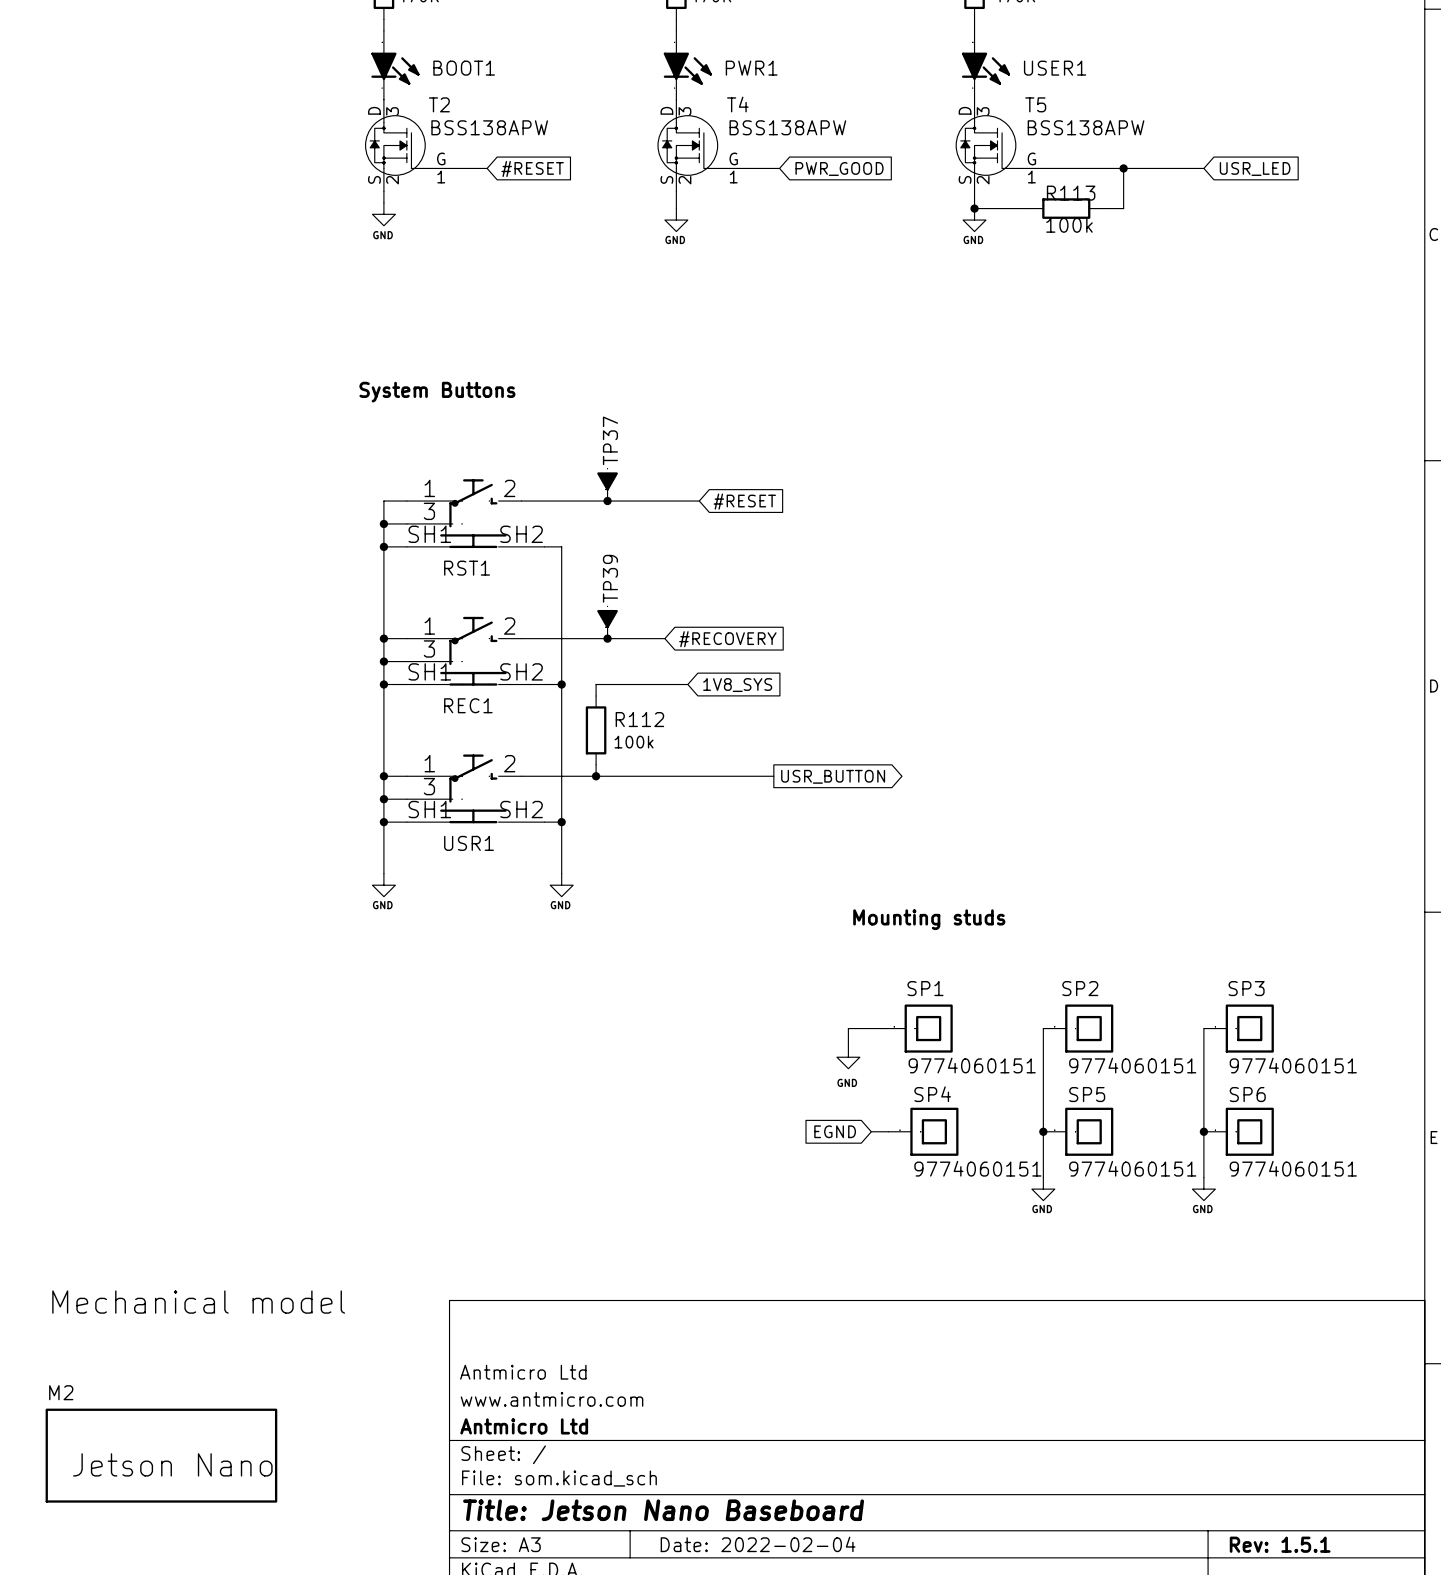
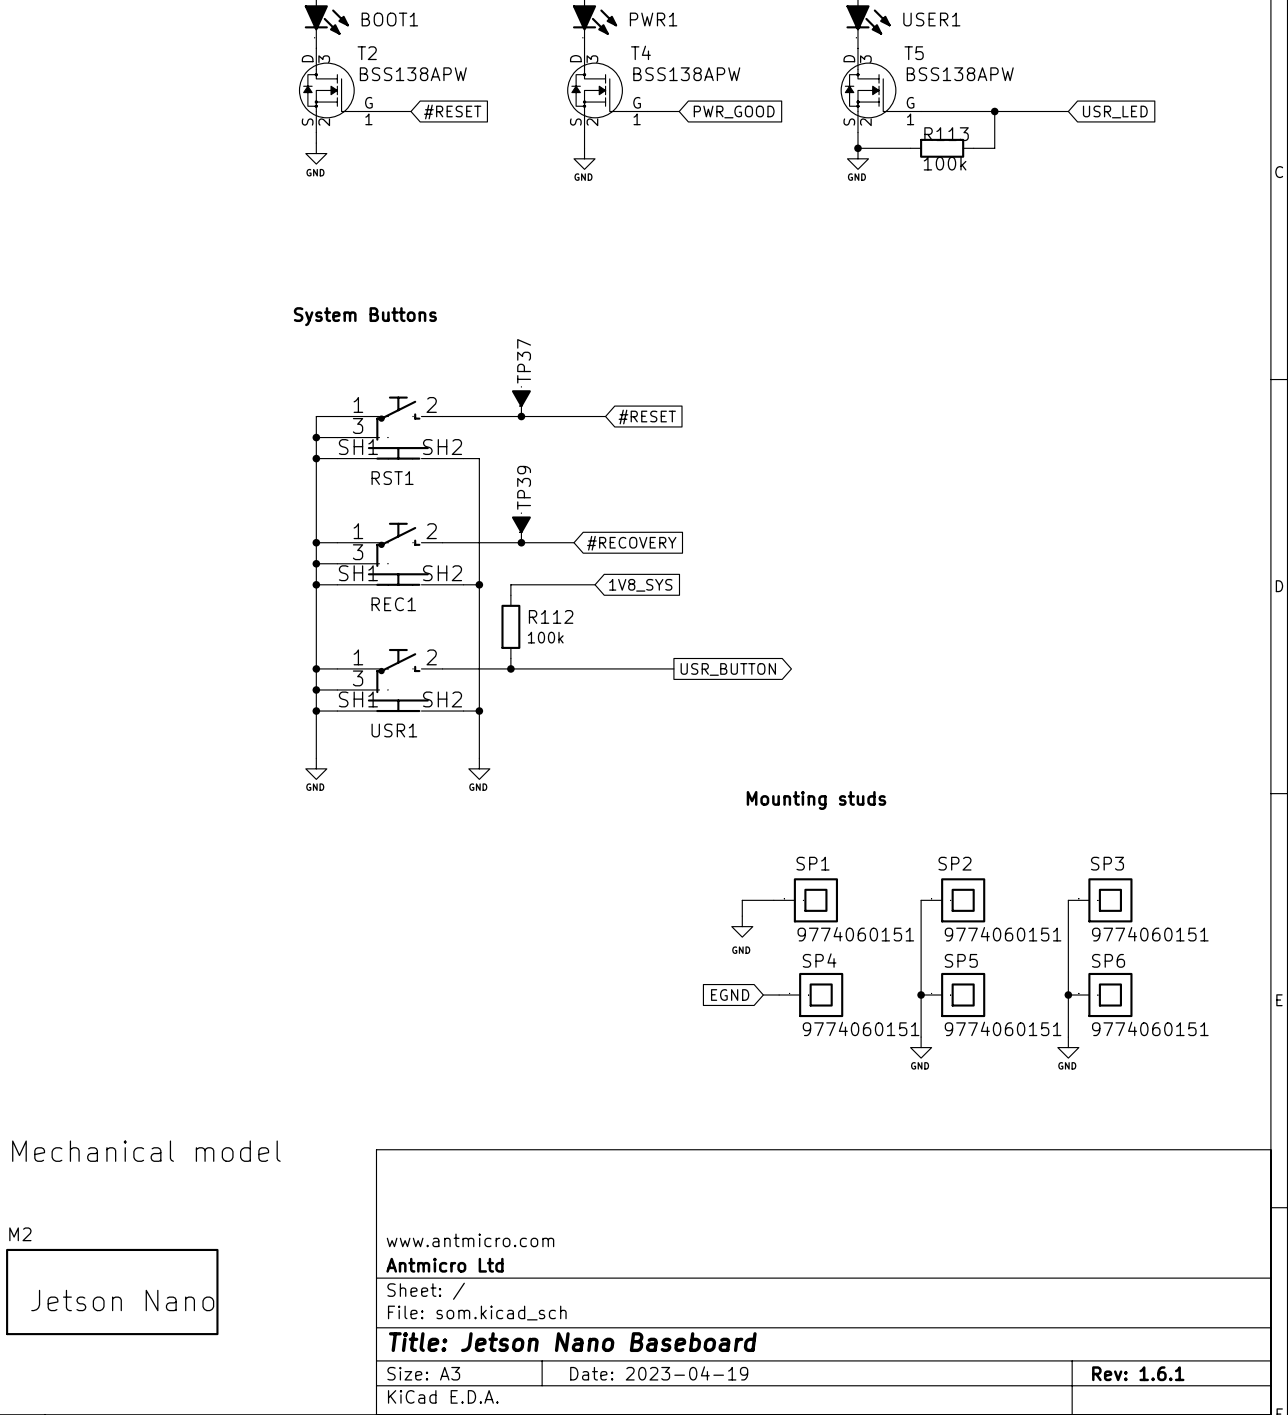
title block: Antmicro Ltd (523, 1372) -> none
title block: Date: 2022-02-04 (758, 1544) -> Date: 2023-04-19 (659, 1373)
title block: Rev: 1.5.1 (1280, 1544) -> Rev: 1.6.1 (1138, 1373)

